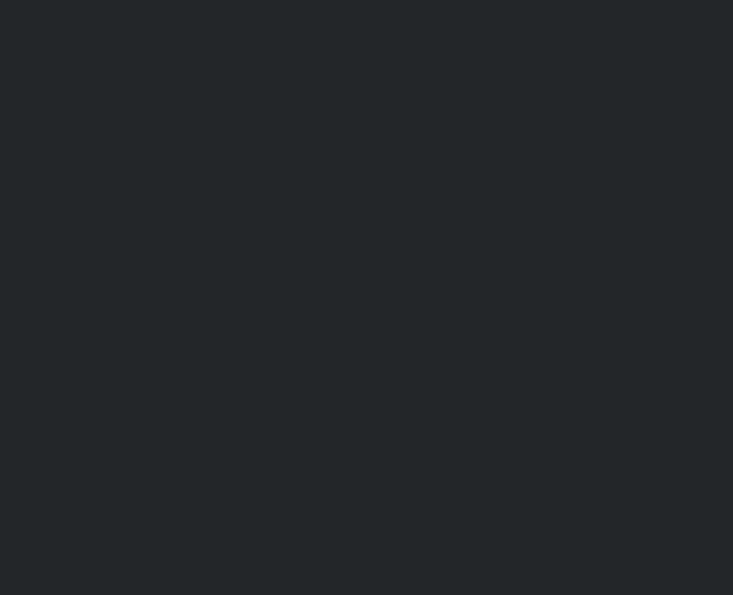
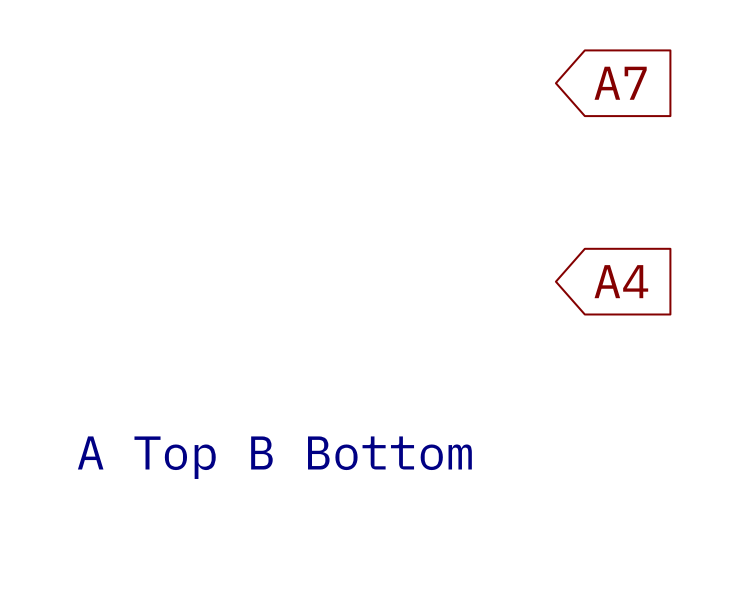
global label: none -> A7 (620, 83)
global label: none -> A4 (621, 281)
text: none -> A Top B Bottom (274, 457)

